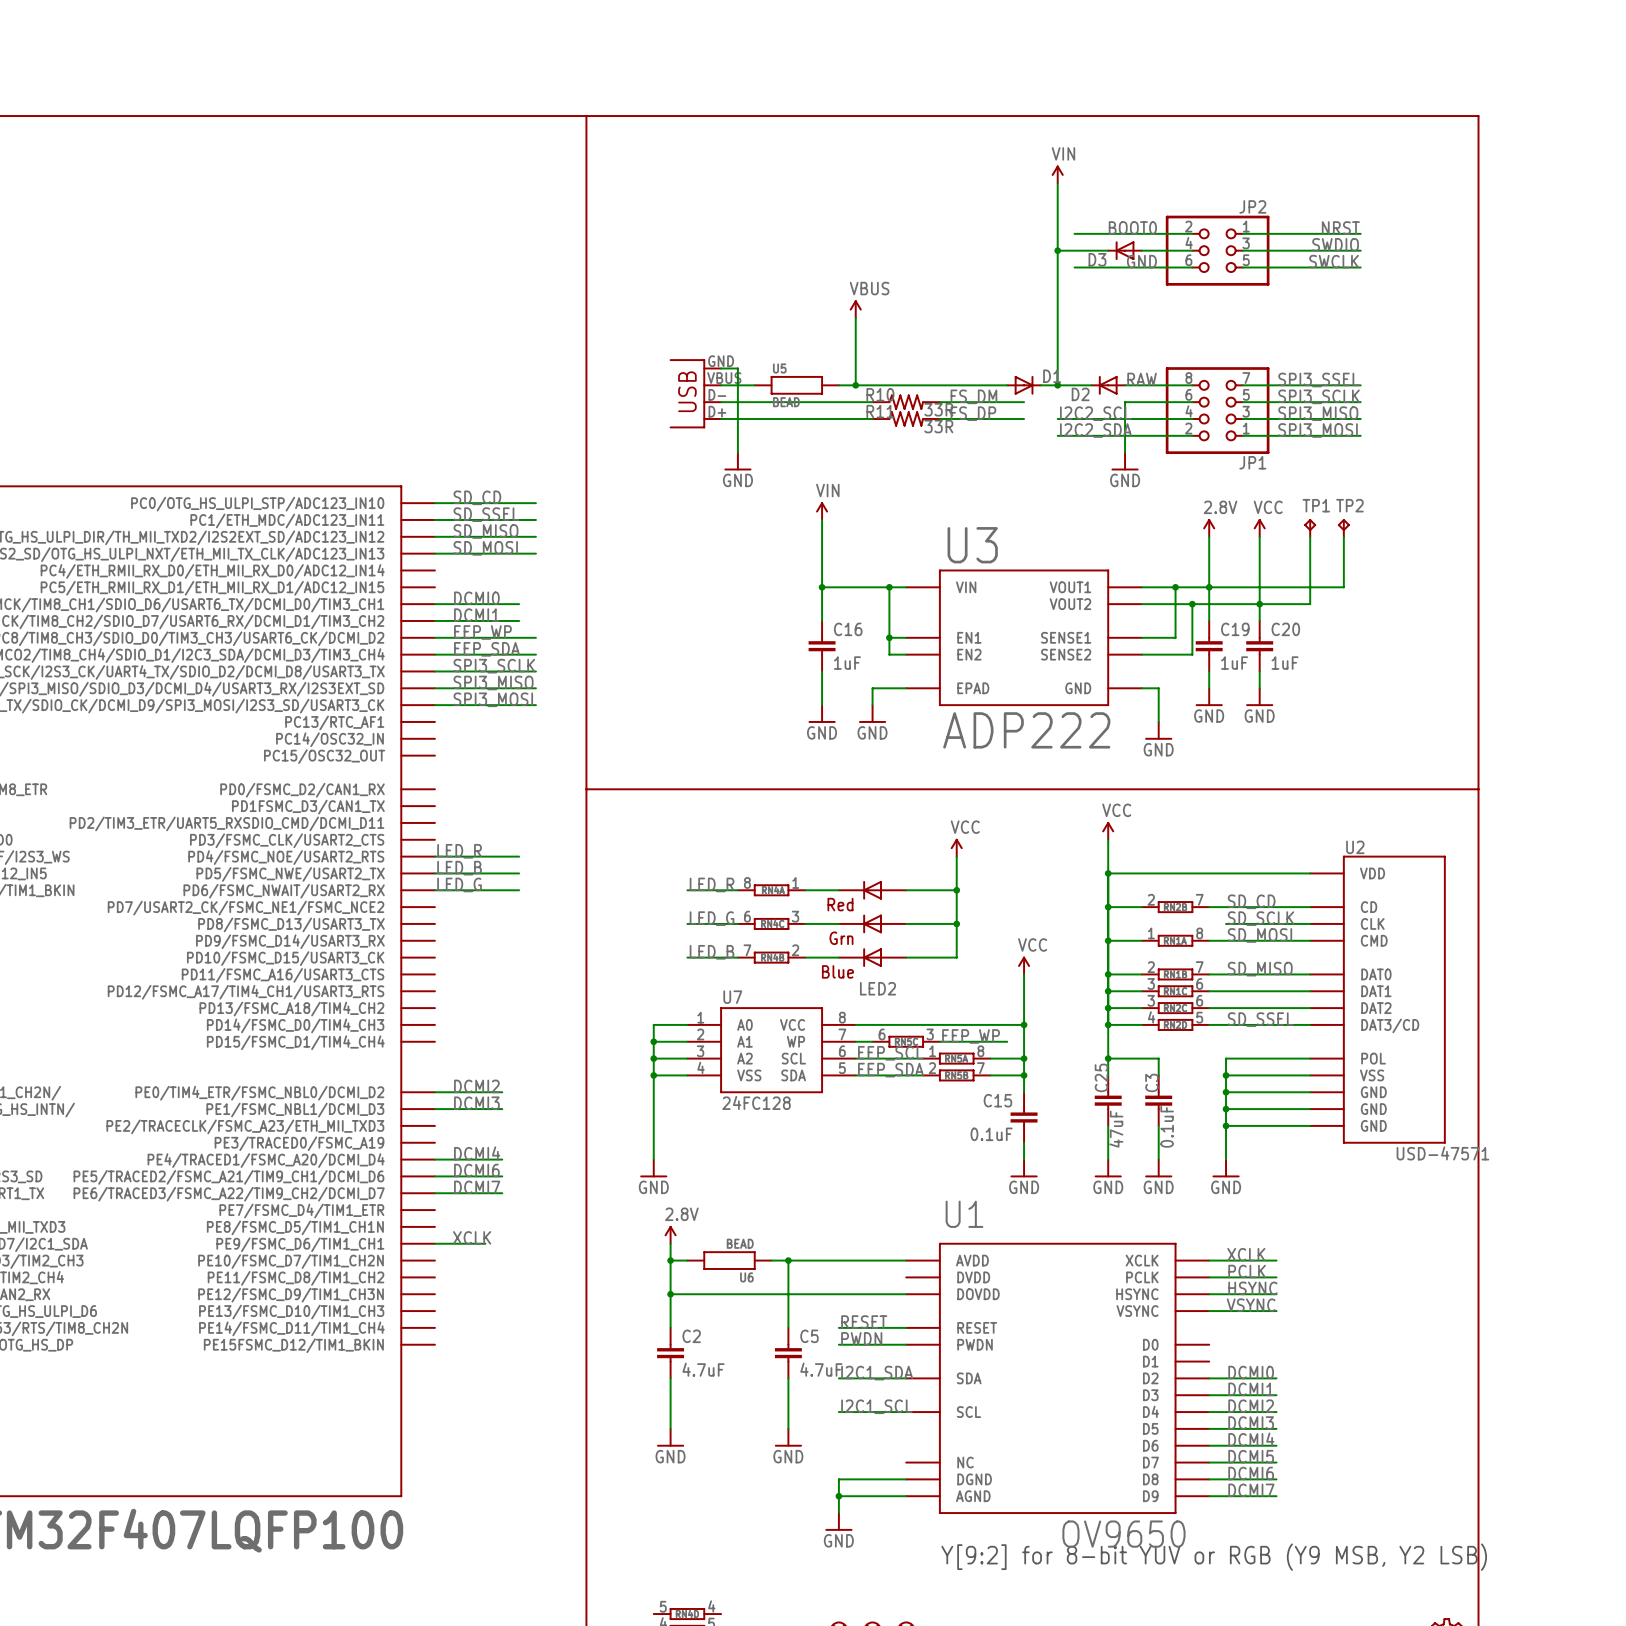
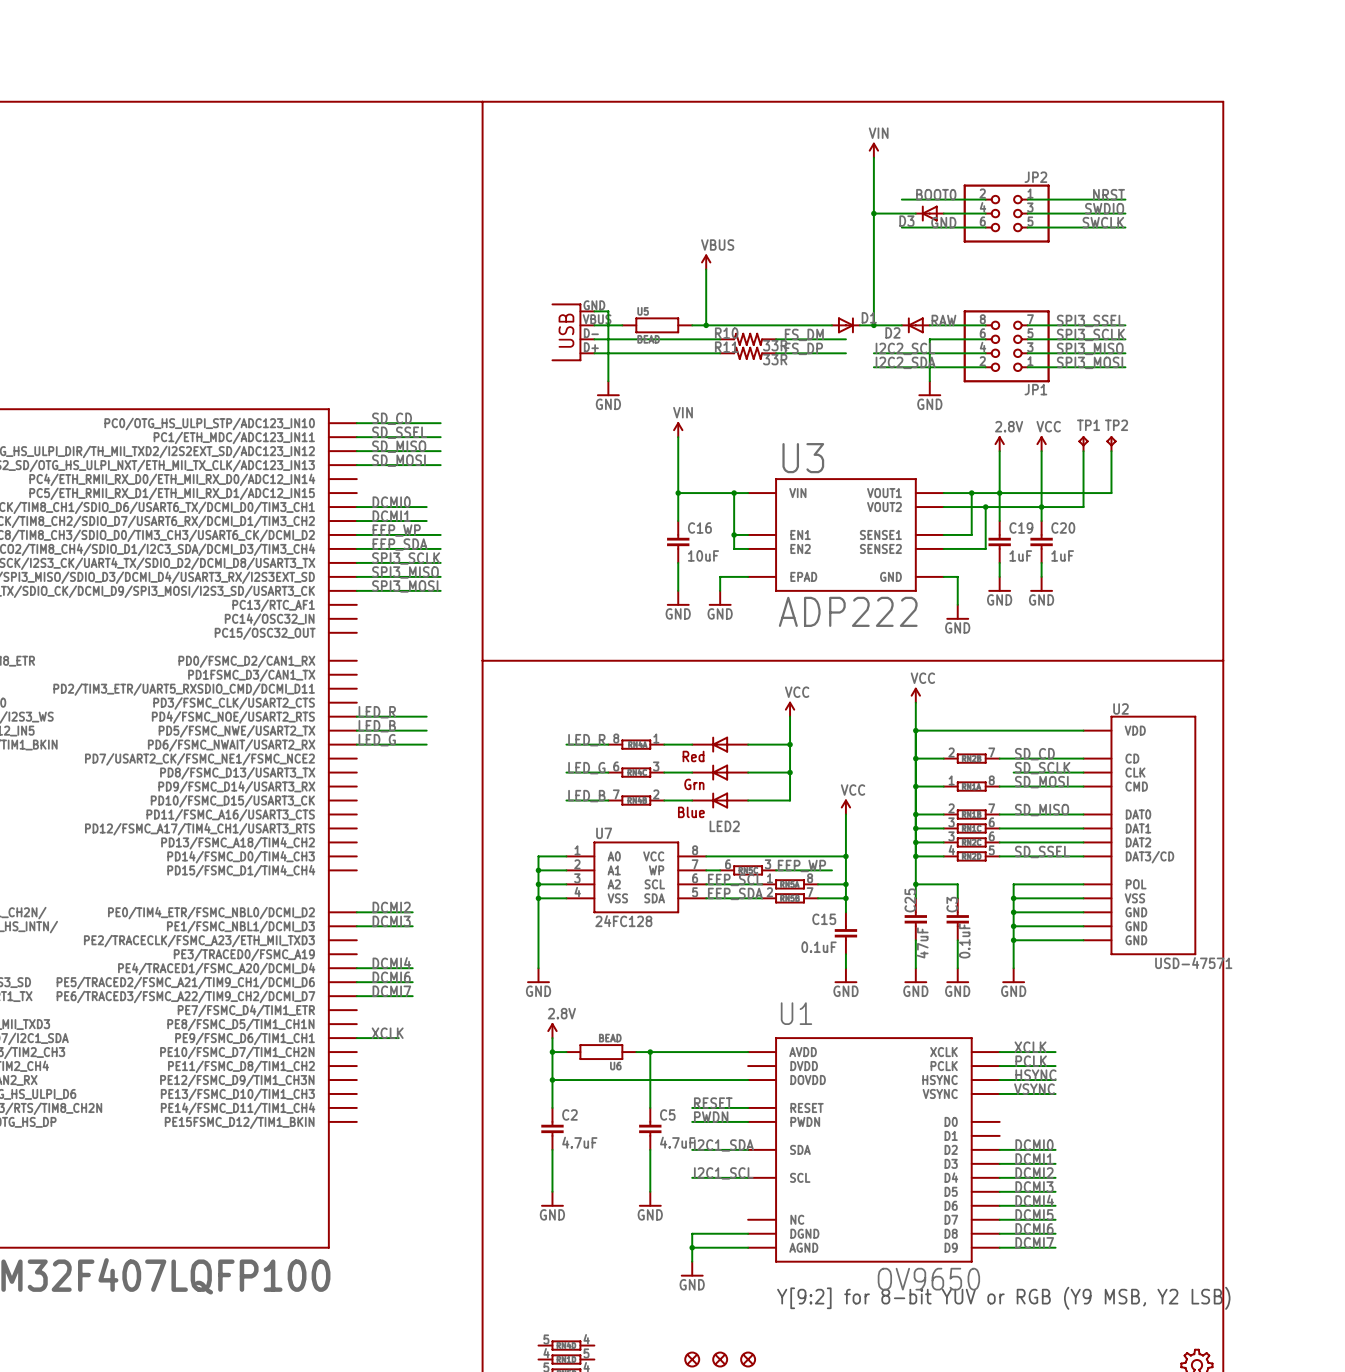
wire: (1074, 233) (1091, 233) -> none
wire: (1074, 267) (1091, 267) -> none
C16 value: 1uF (847, 663) -> 10uF (703, 555)

